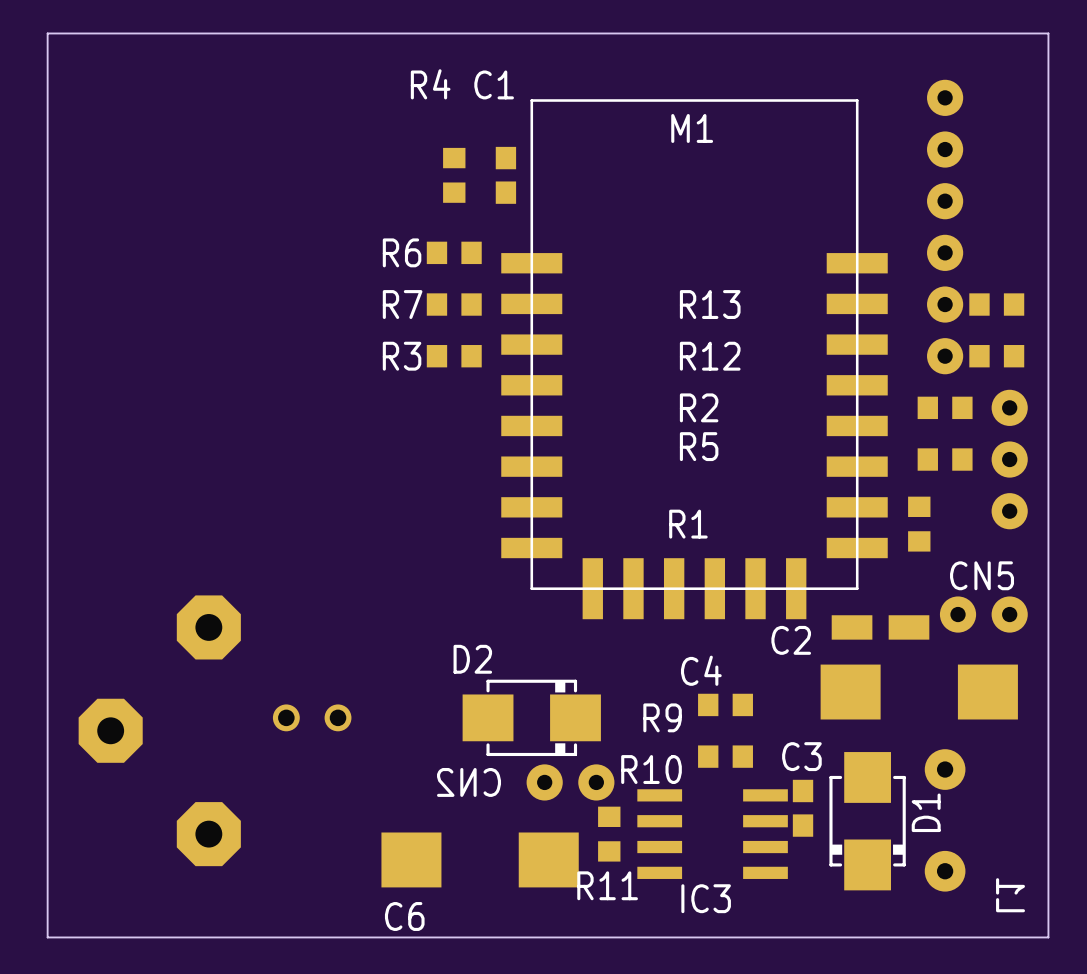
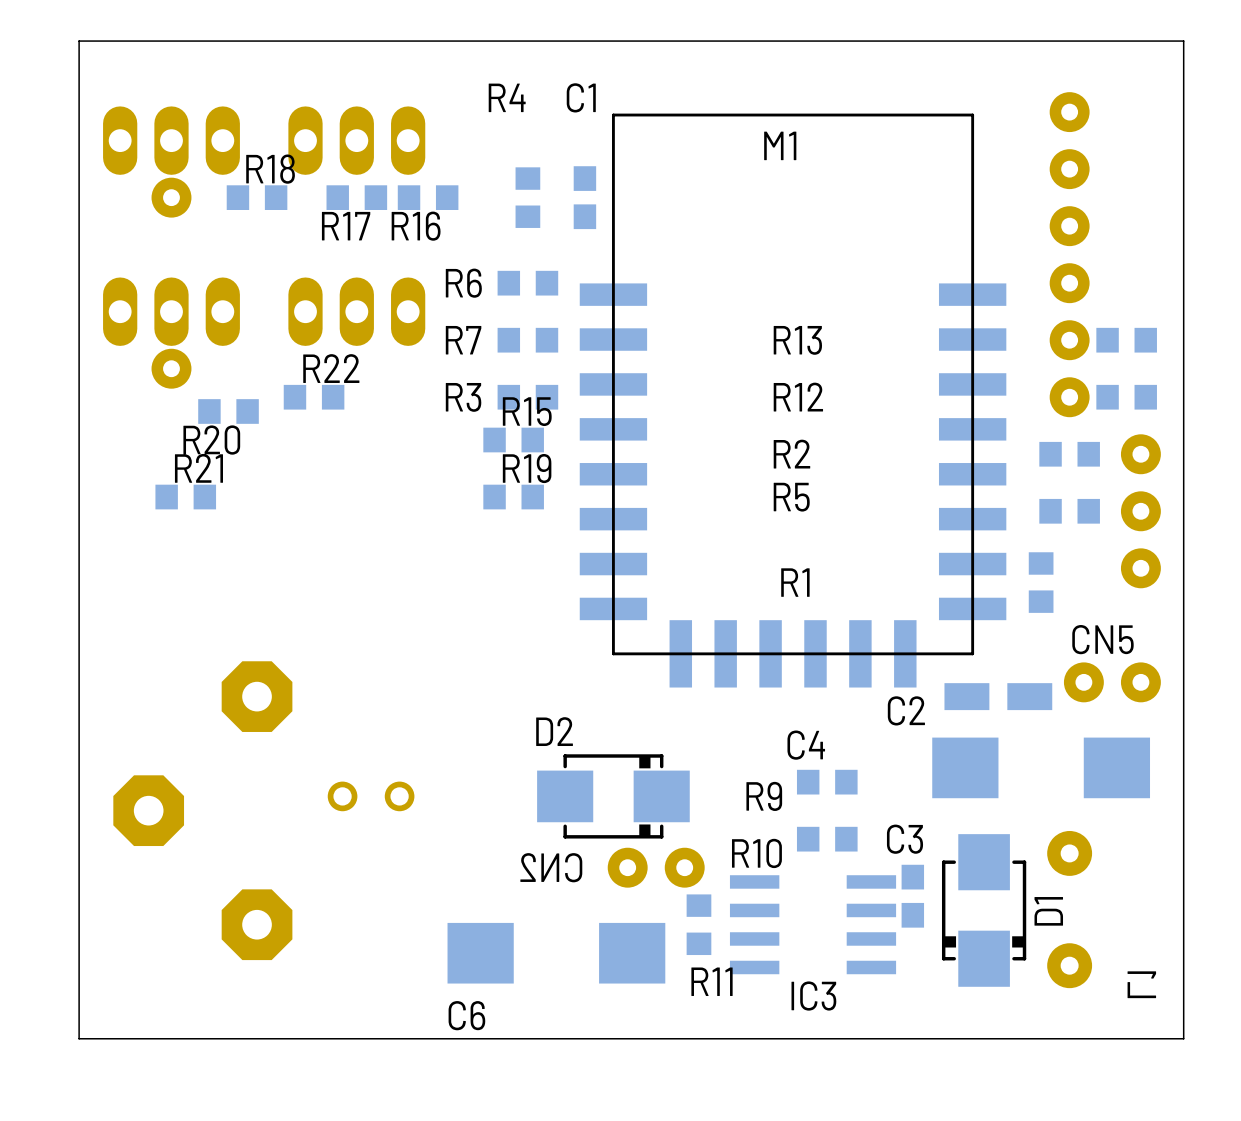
part: none -> (171, 140)
part: none -> (356, 140)
part: none -> (171, 197)
R18: none -> (257, 197)
R17: none -> (356, 197)
R16: none -> (428, 197)
part: none -> (171, 311)
part: none -> (356, 311)
part: none -> (171, 368)
R22: none -> (314, 397)
R20: none -> (228, 411)
R15: none -> (513, 440)
R21: none -> (185, 497)
R19: none -> (513, 497)

